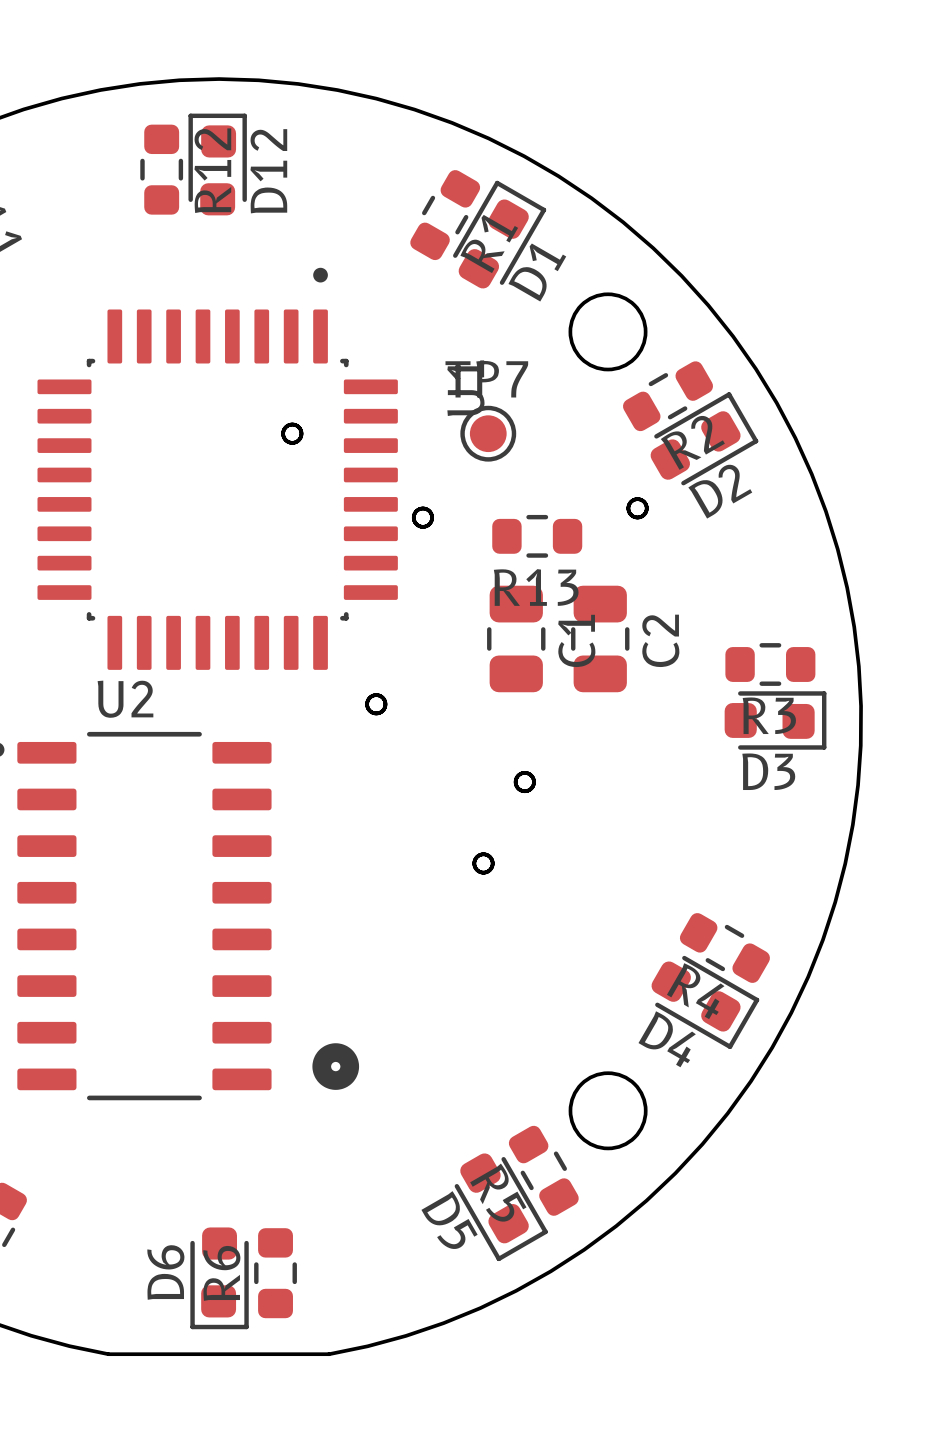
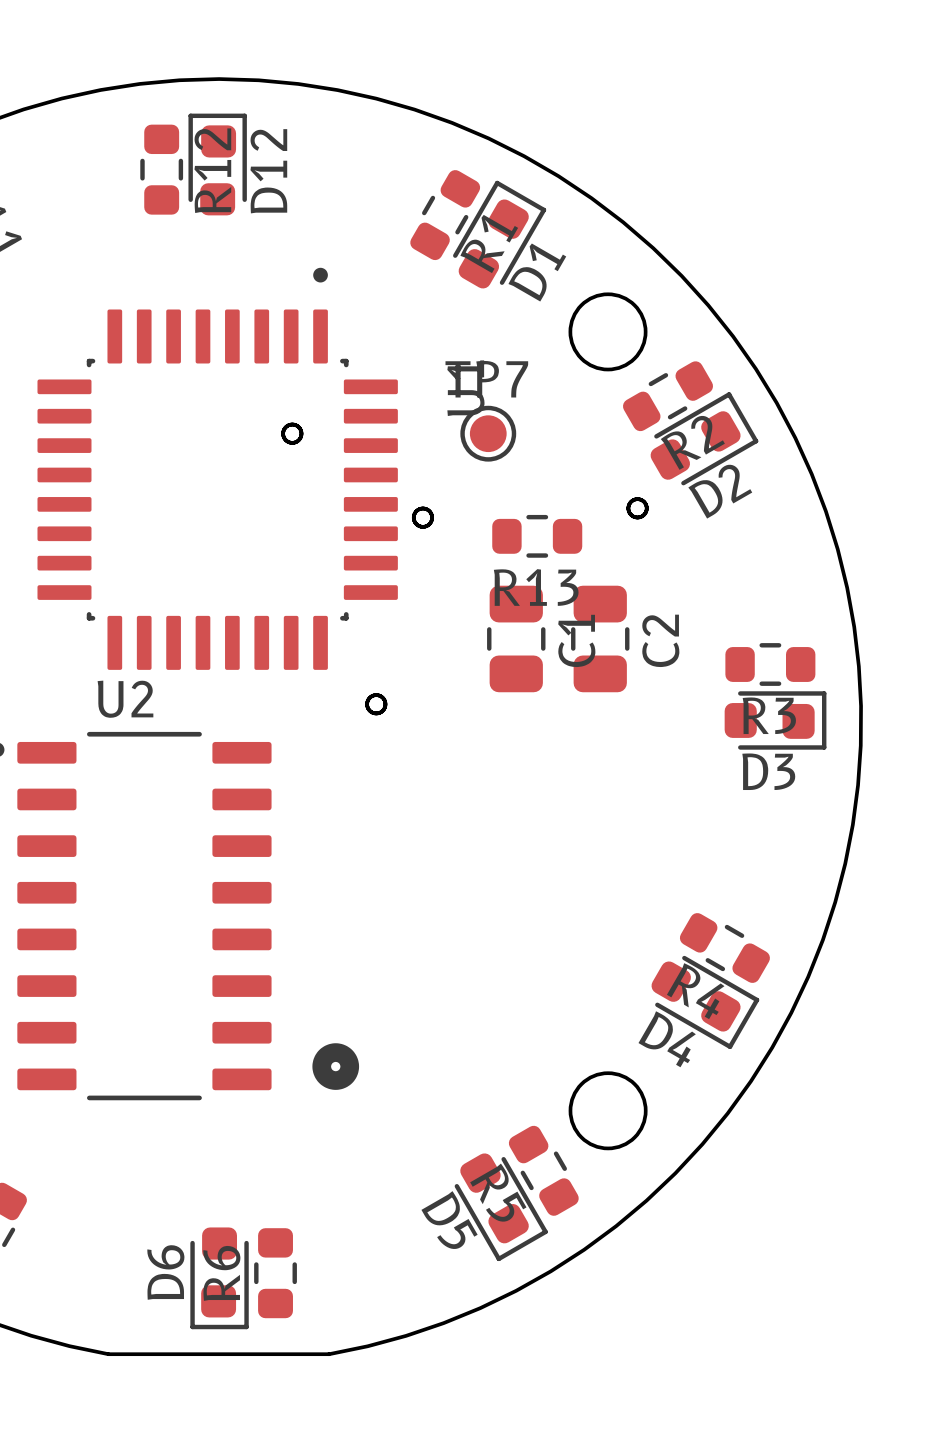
board edge: (524, 772) (517, 776) (515, 782) (518, 789) (525, 791) (531, 787) (533, 781) (530, 775) (524, 772) -> none
board edge: (481, 854) (475, 858) (474, 865) (478, 870) (485, 872) (491, 868) (492, 861) (488, 855) (481, 854) -> none

